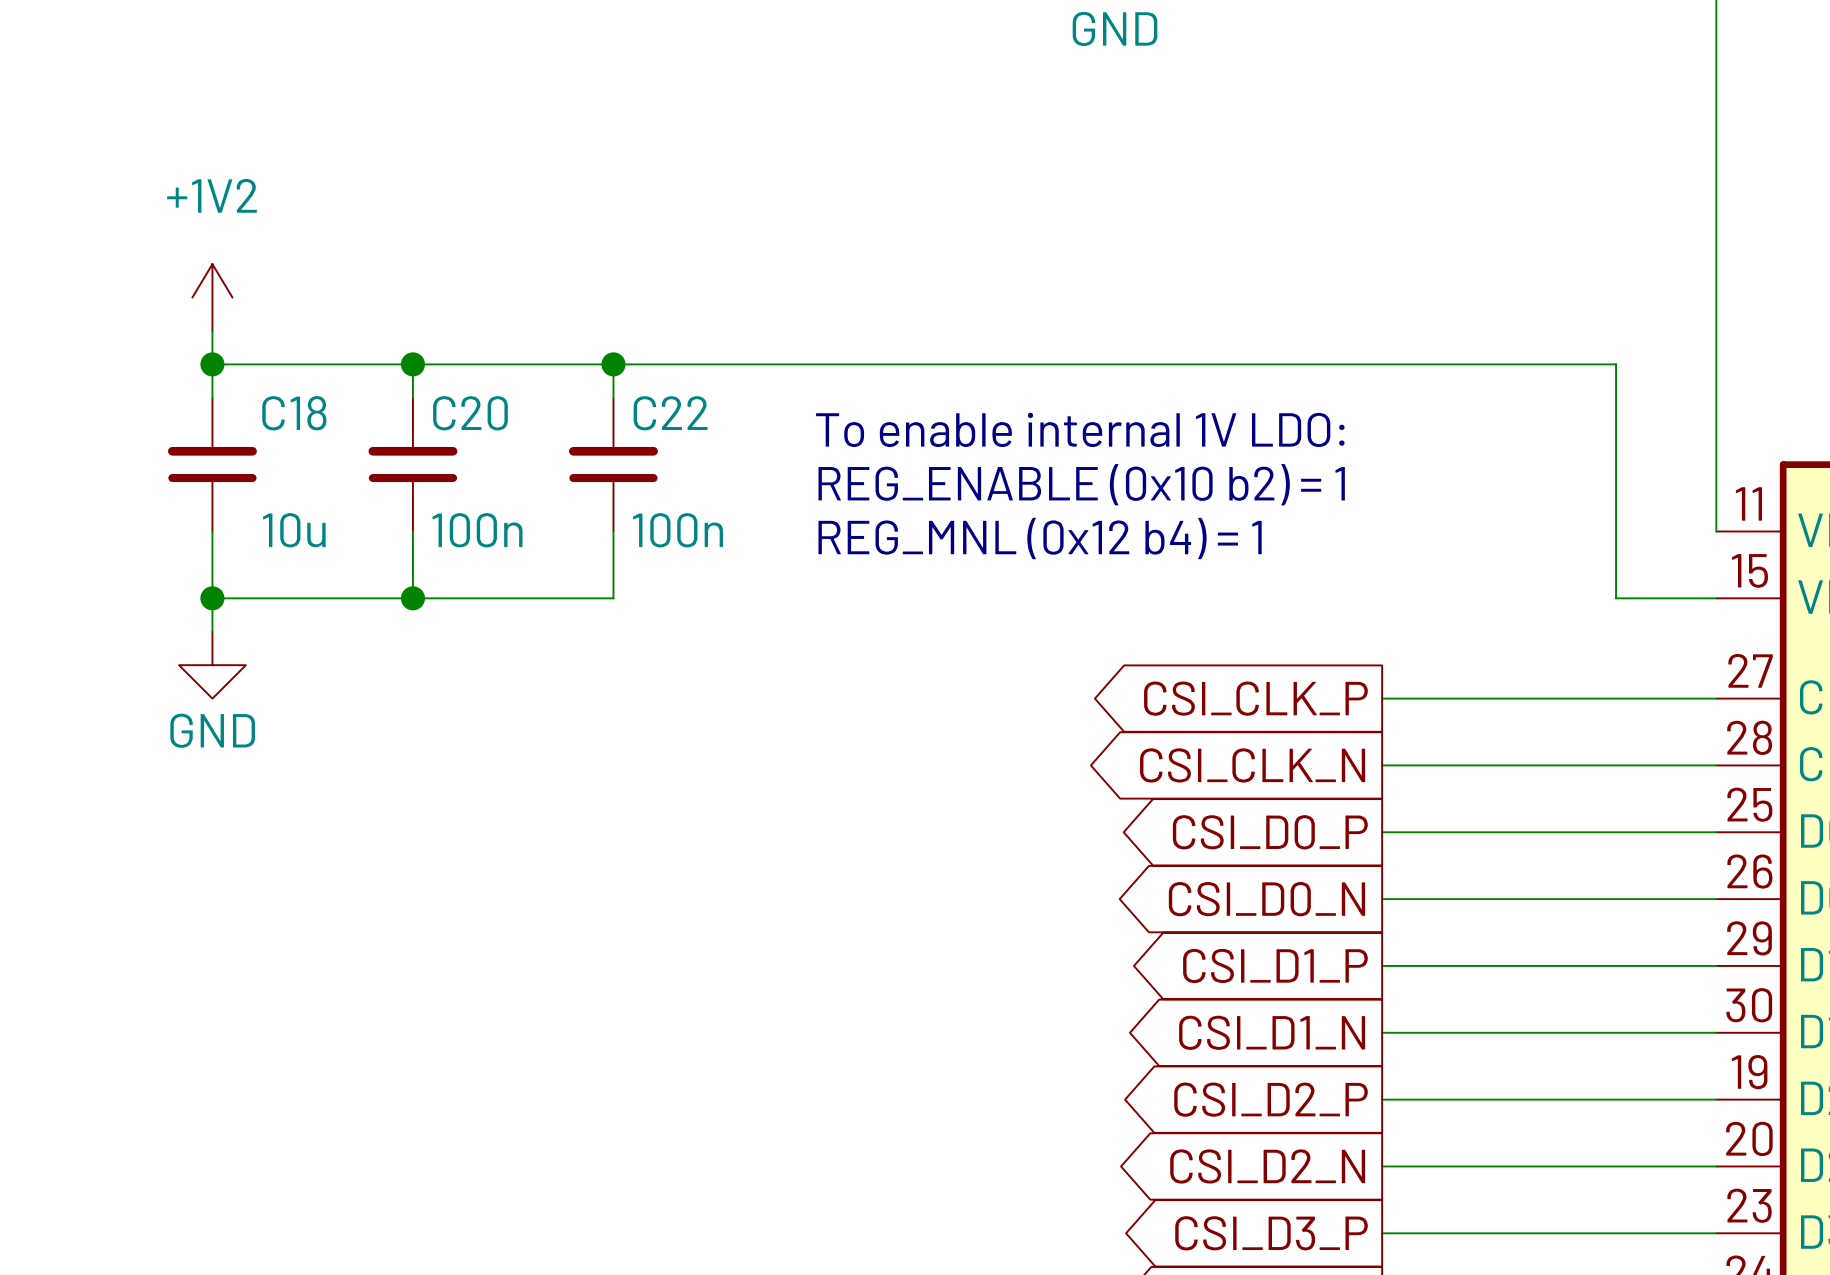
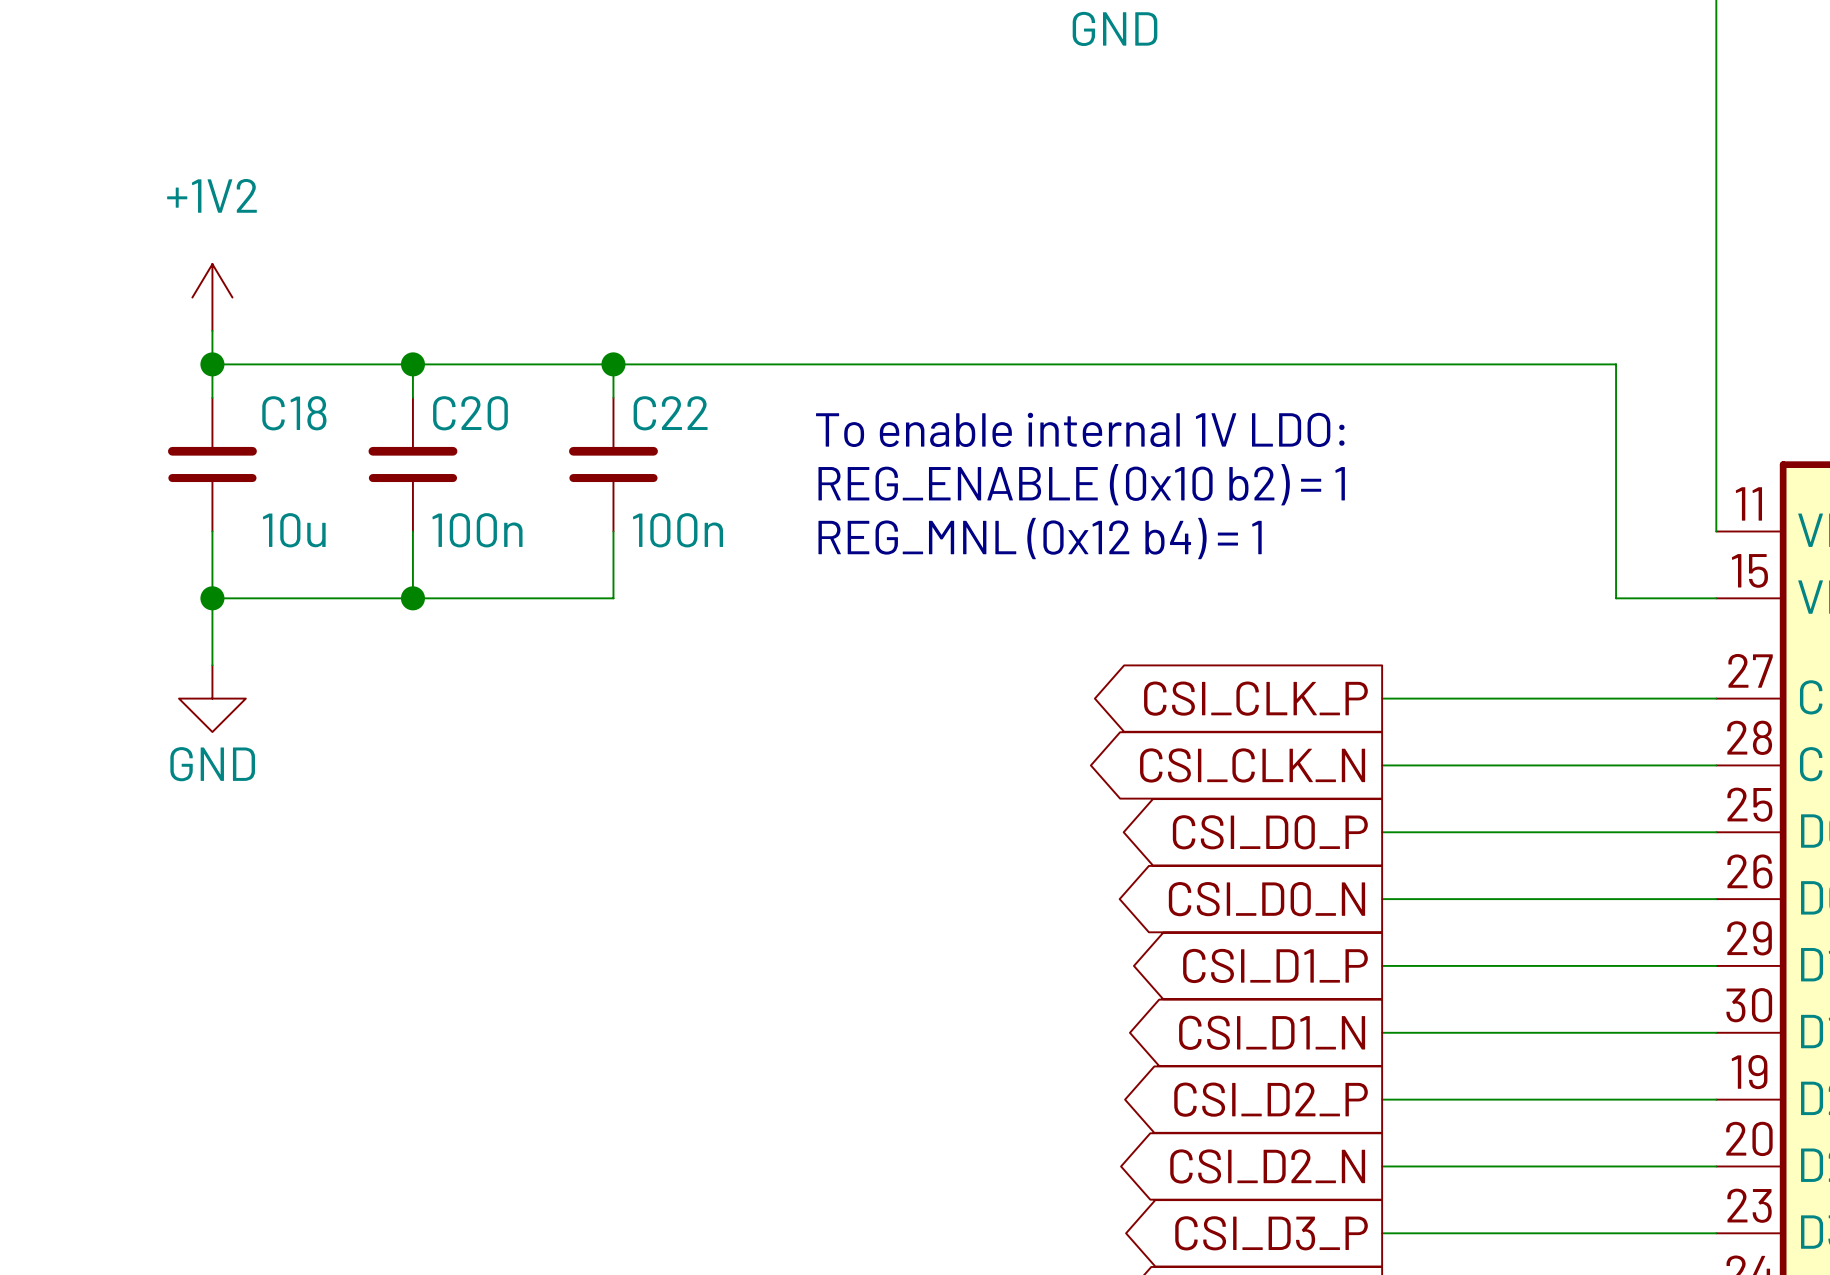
power symbol position: GND (212, 665) -> GND (212, 698)

